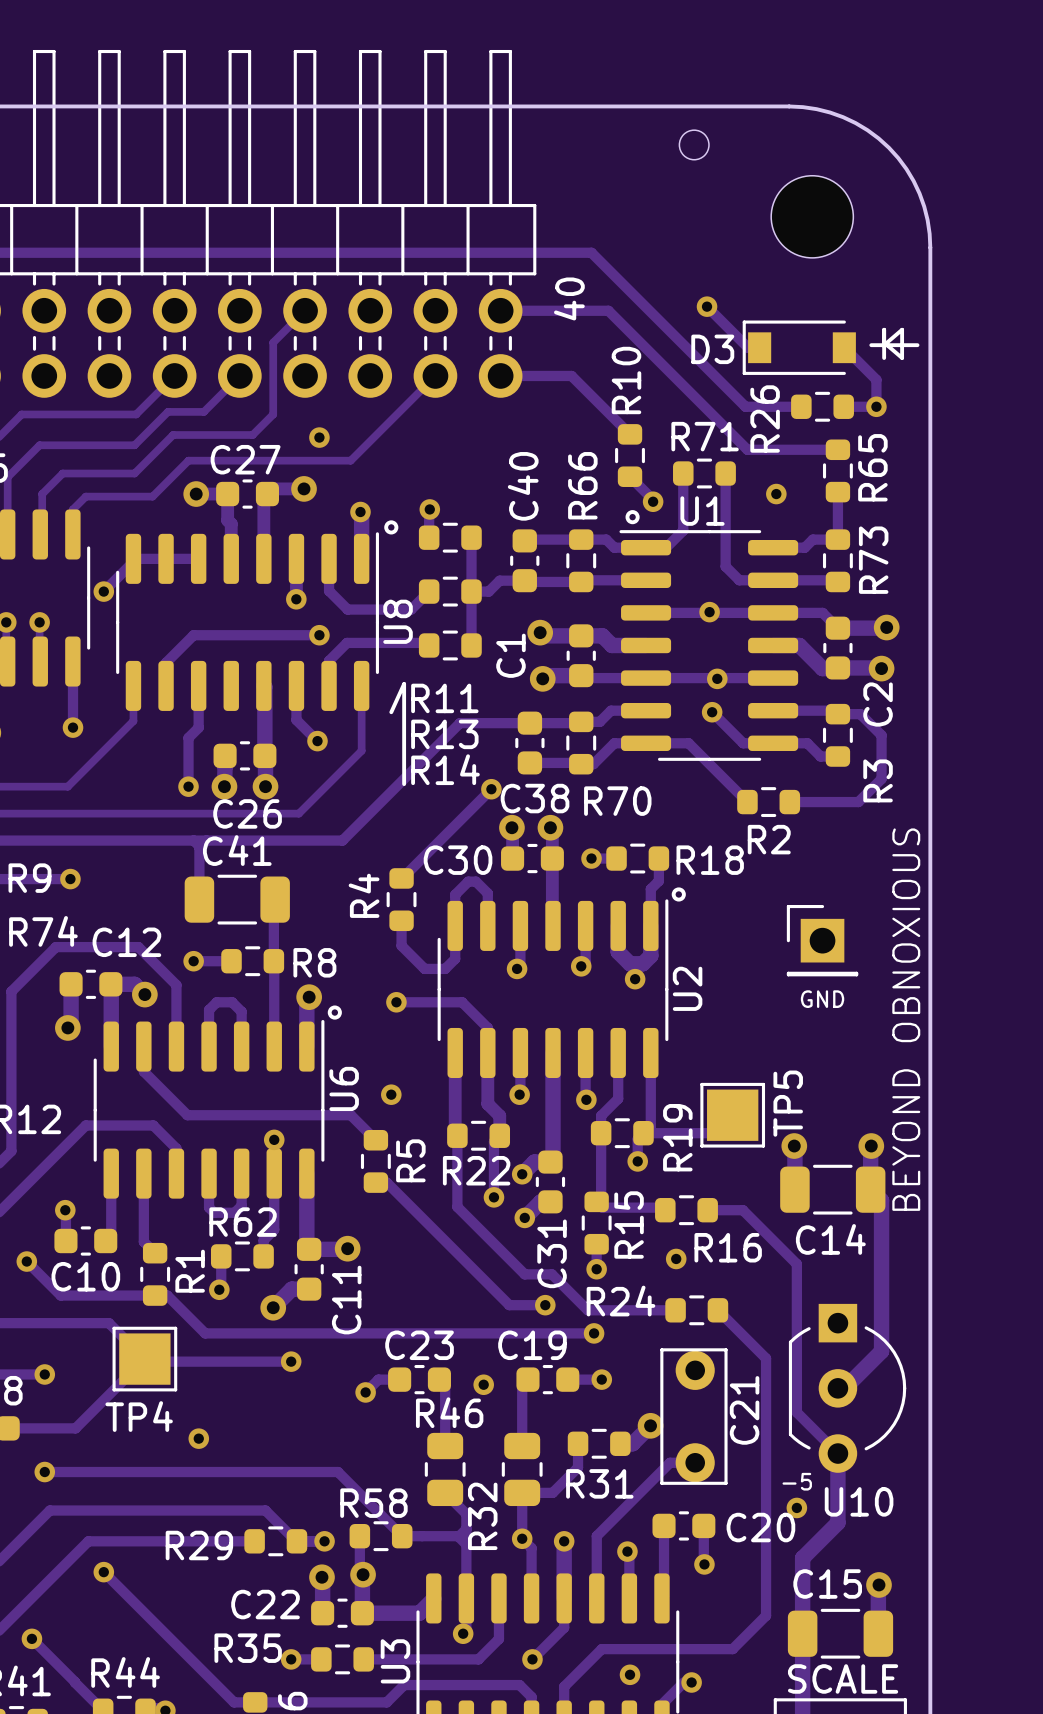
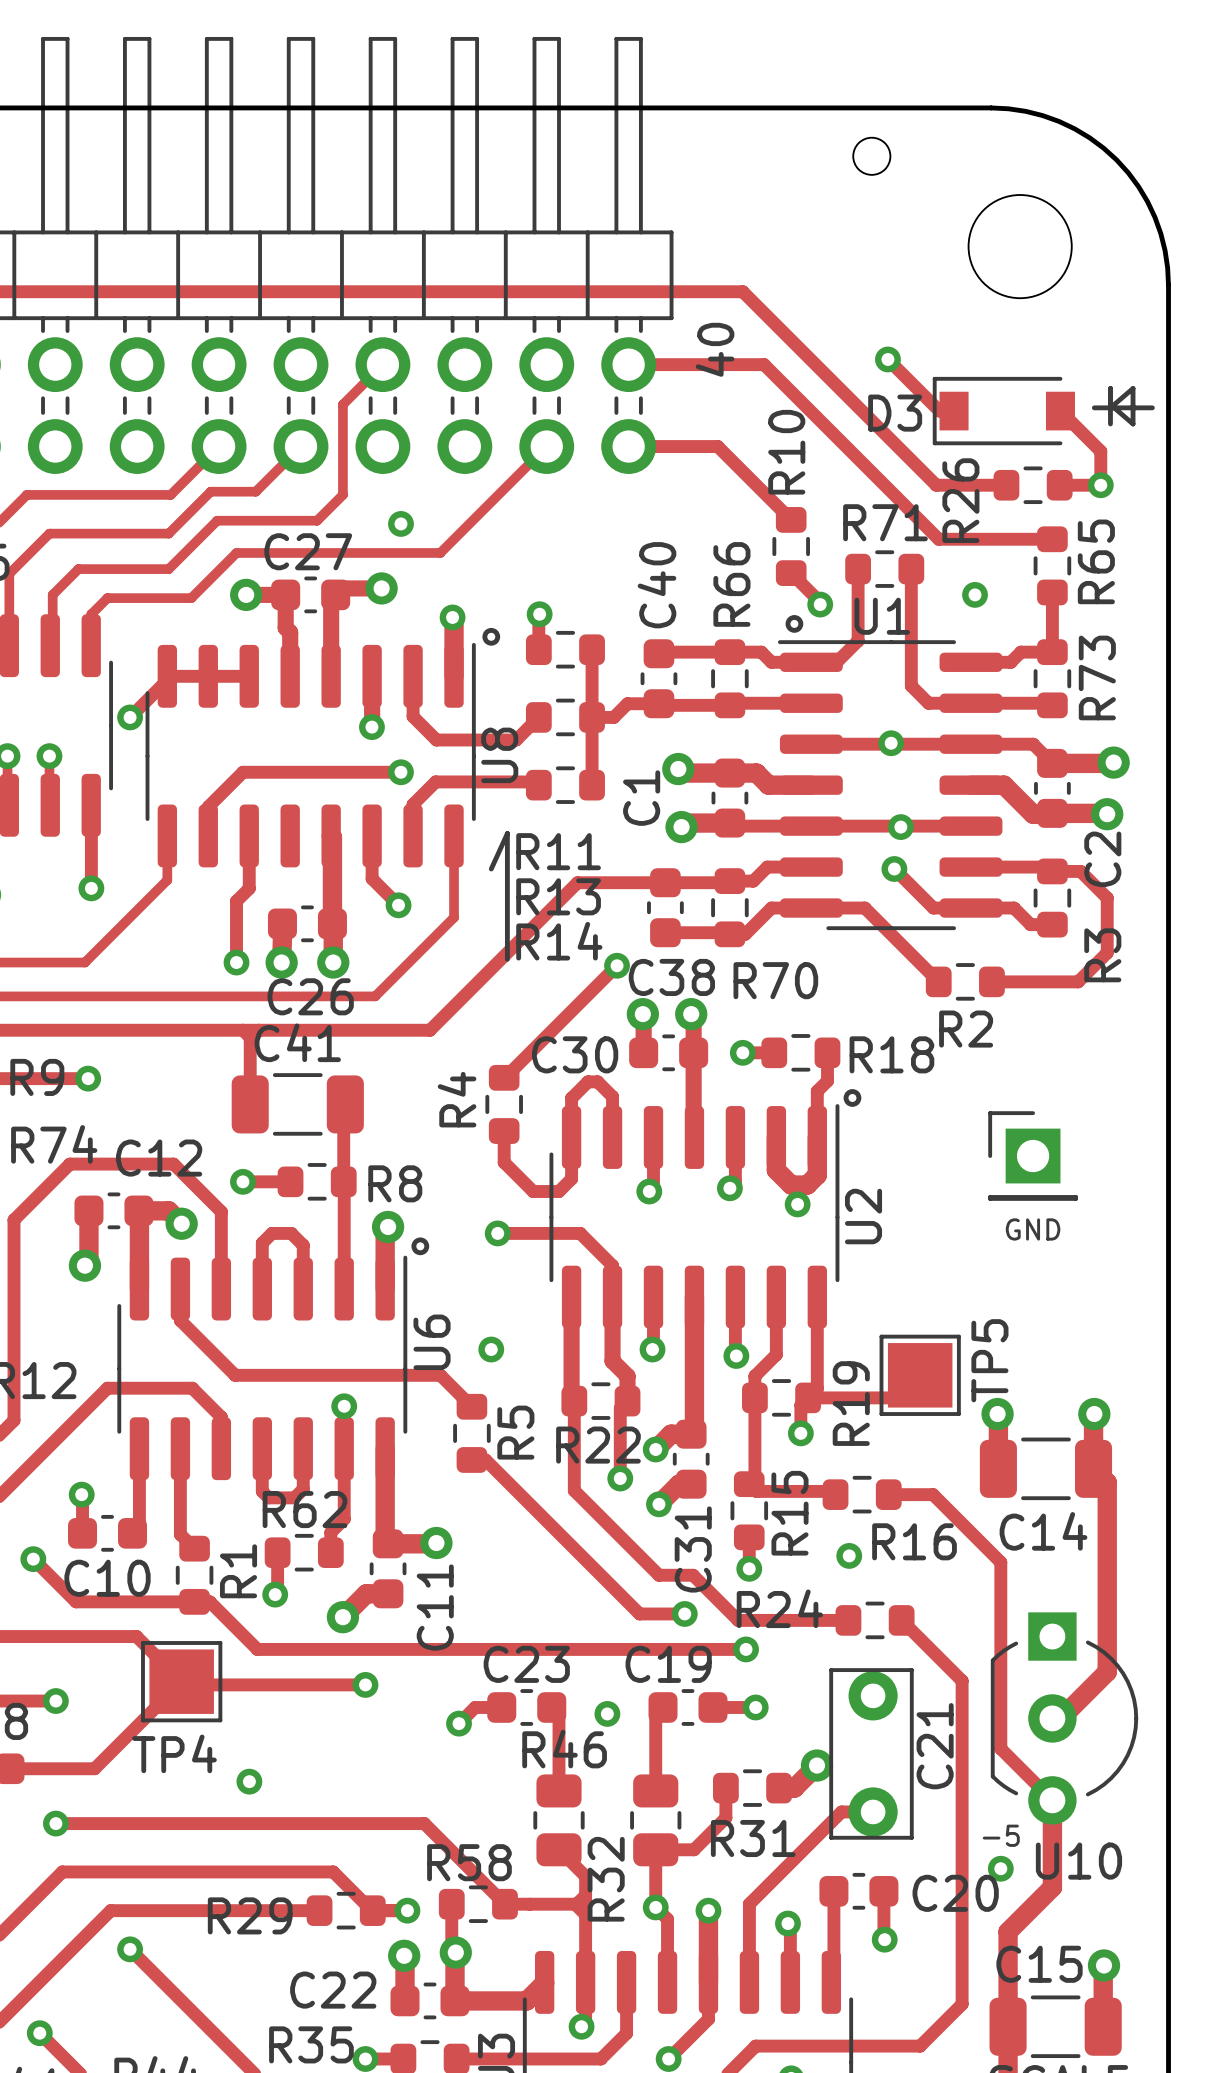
text: BEYOND OBNOXIOUS (906, 1019) -> none

